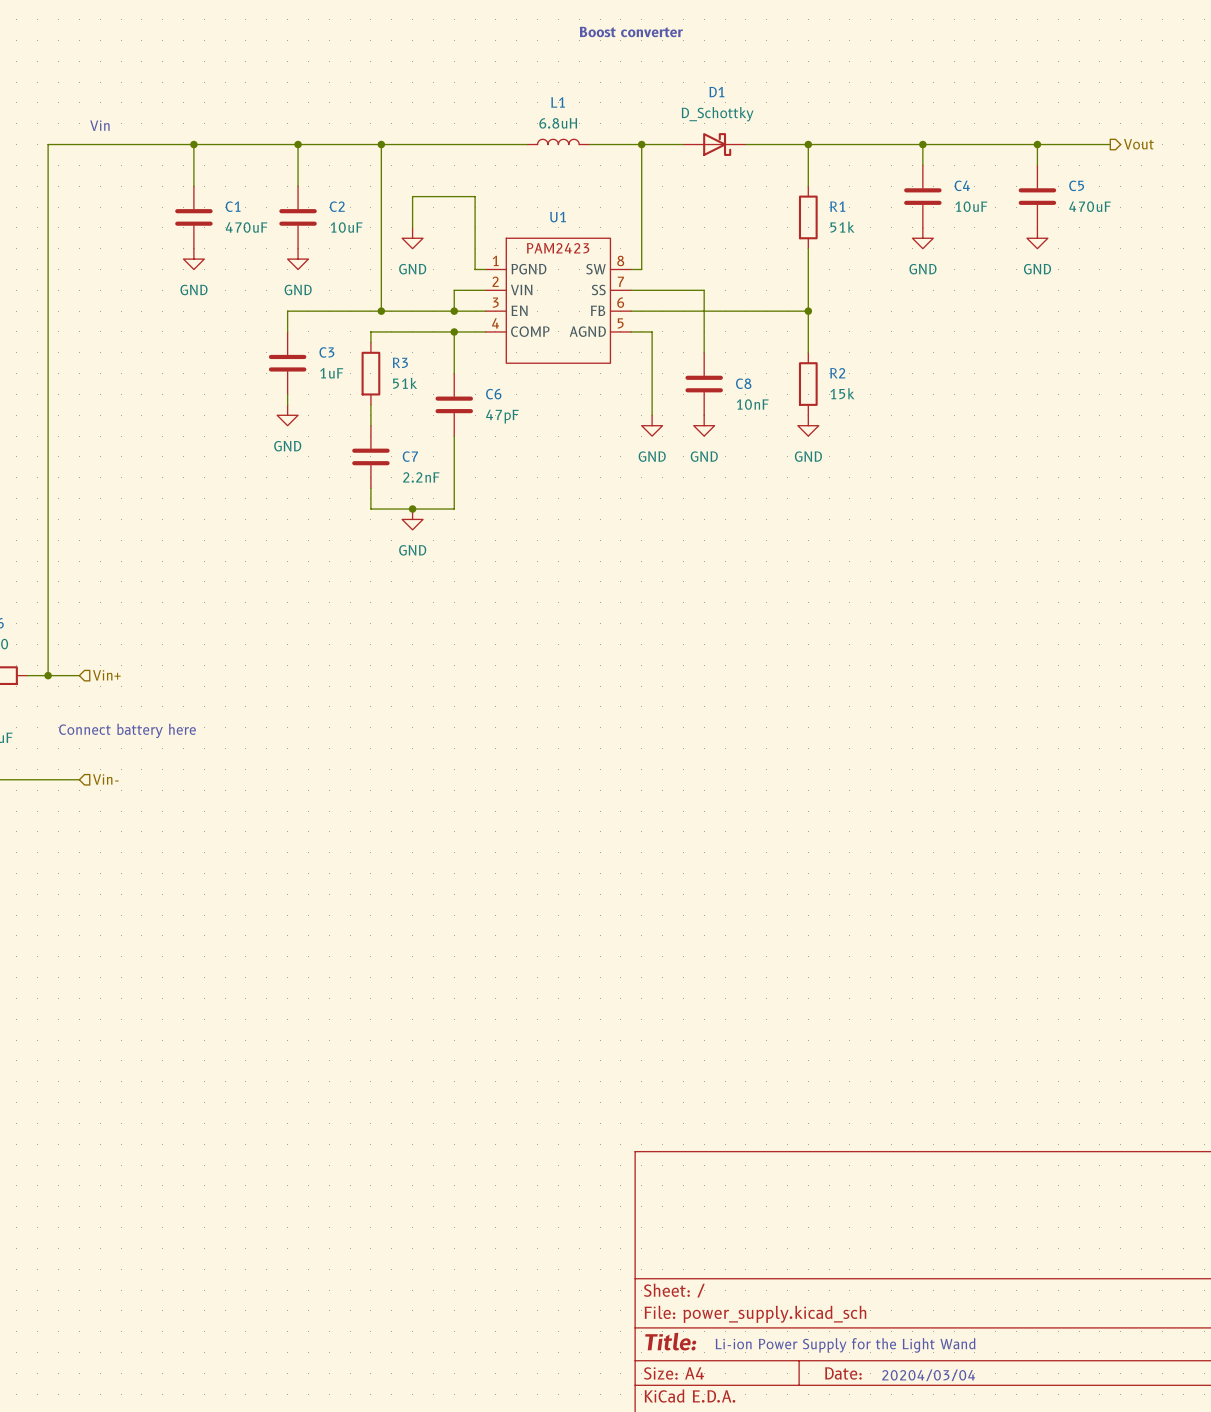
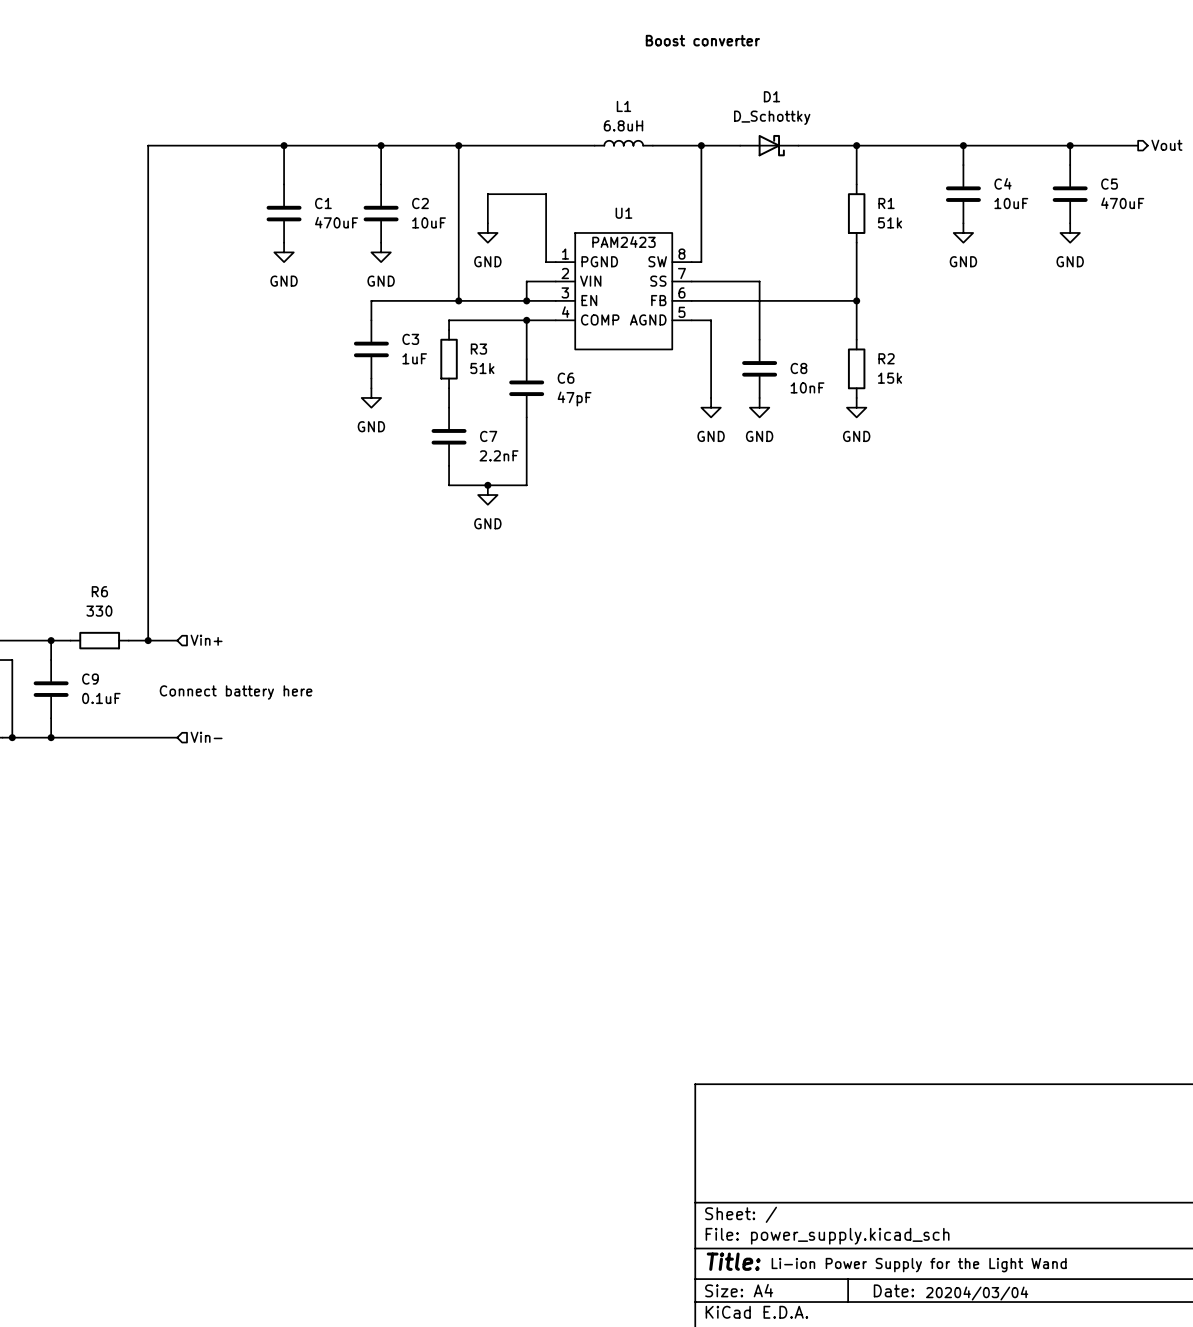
text: Vin (99, 125) -> none

